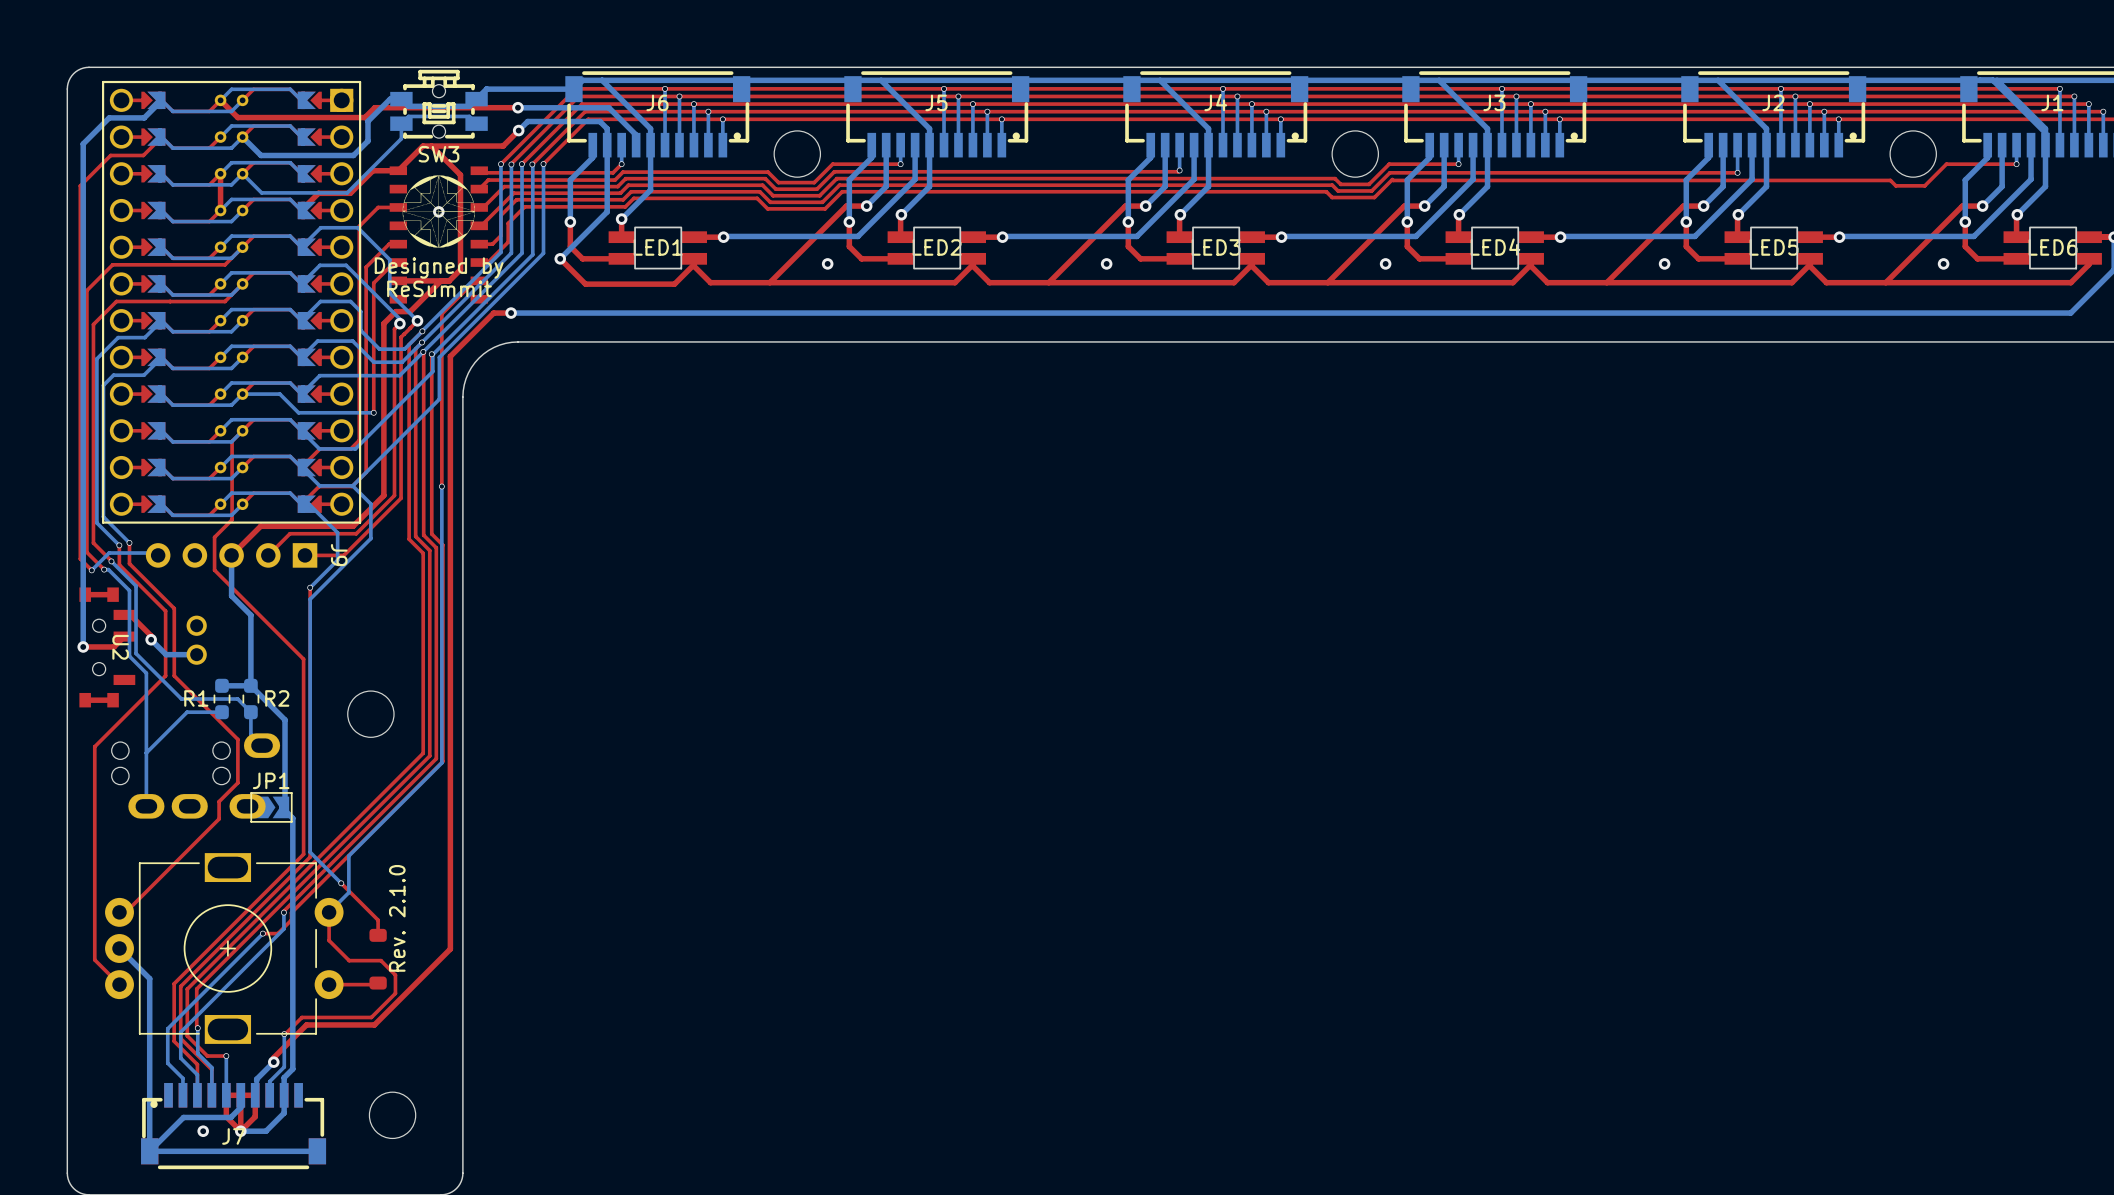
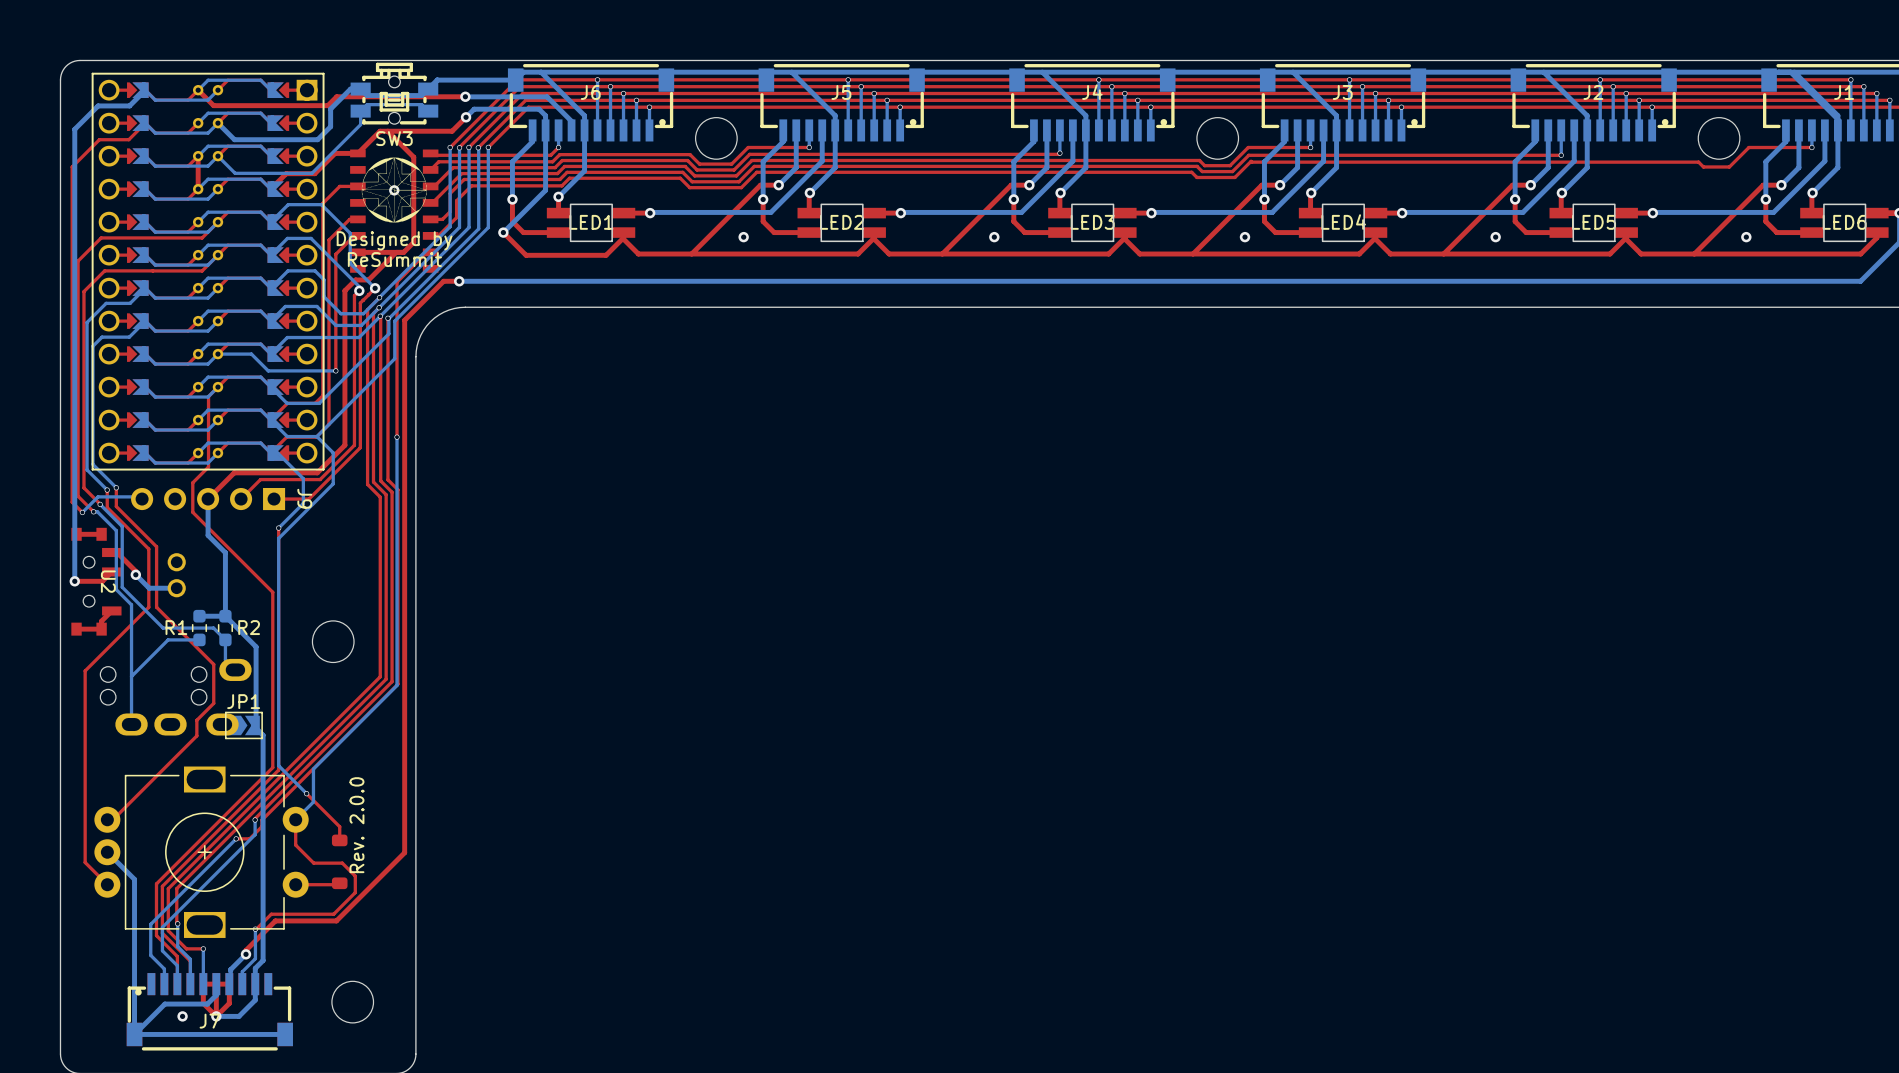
top track: none -> (111, 610) (101, 621) (101, 629)
text: Rev. 2.1.0 (397, 918) -> Rev. 2.0.0 (356, 825)

